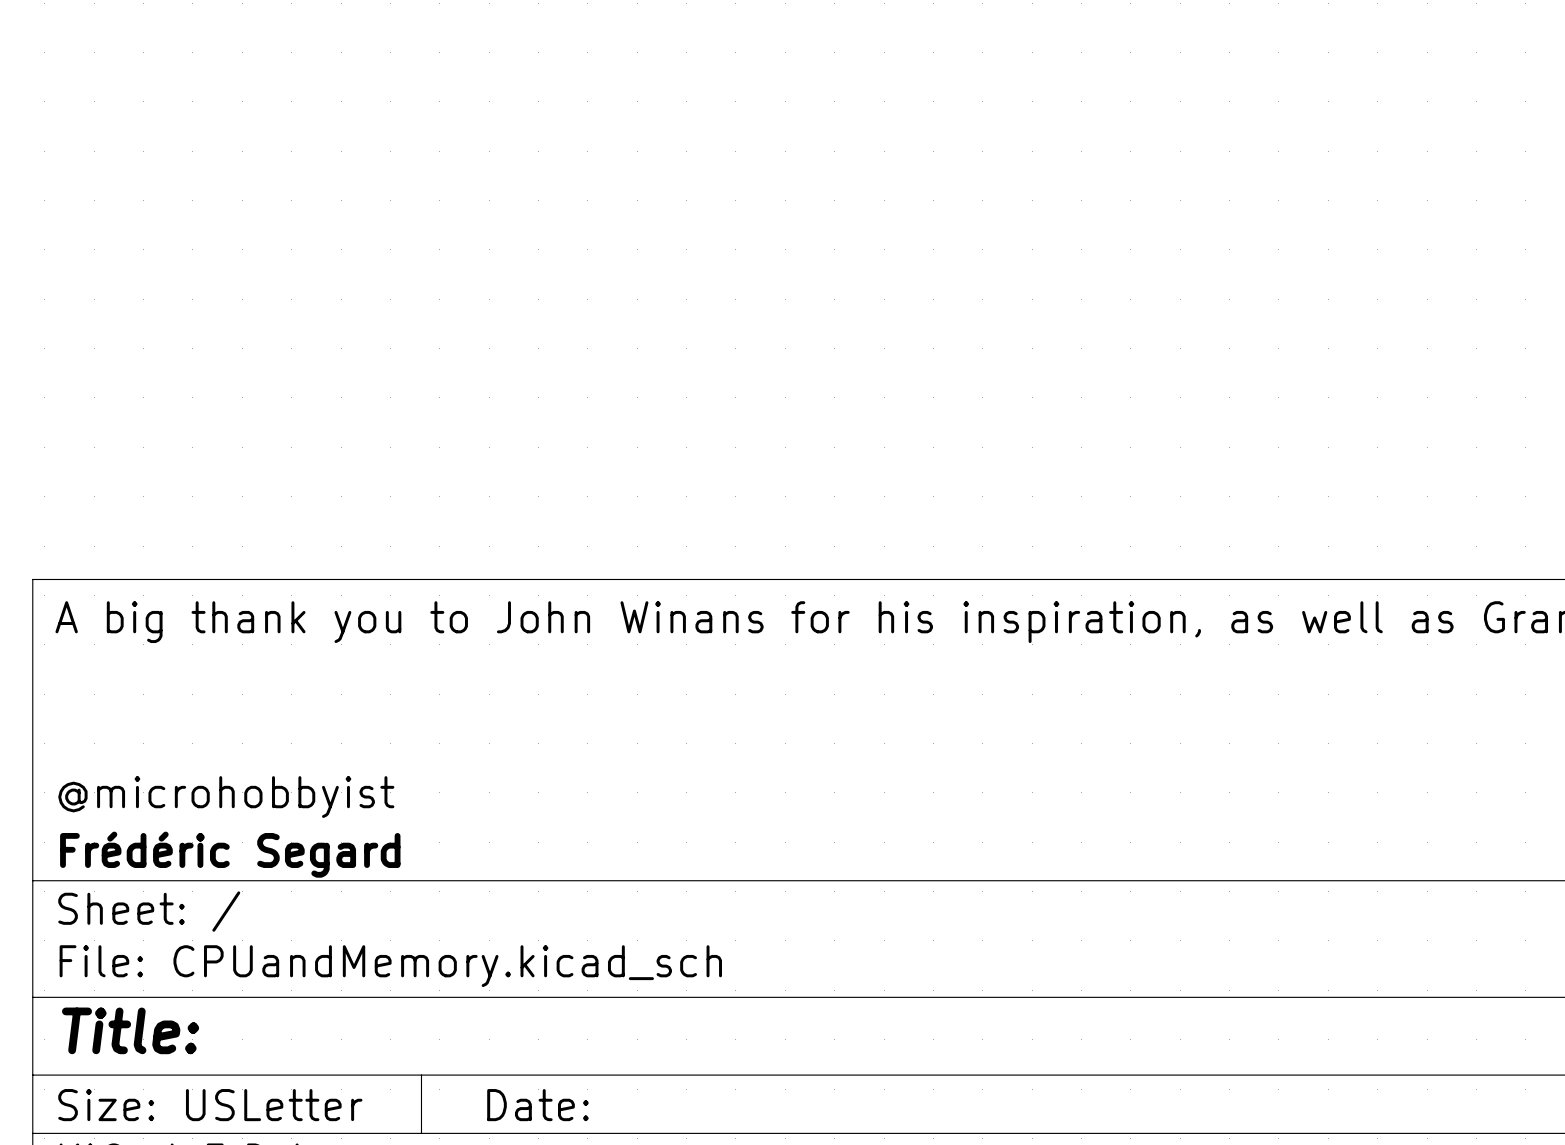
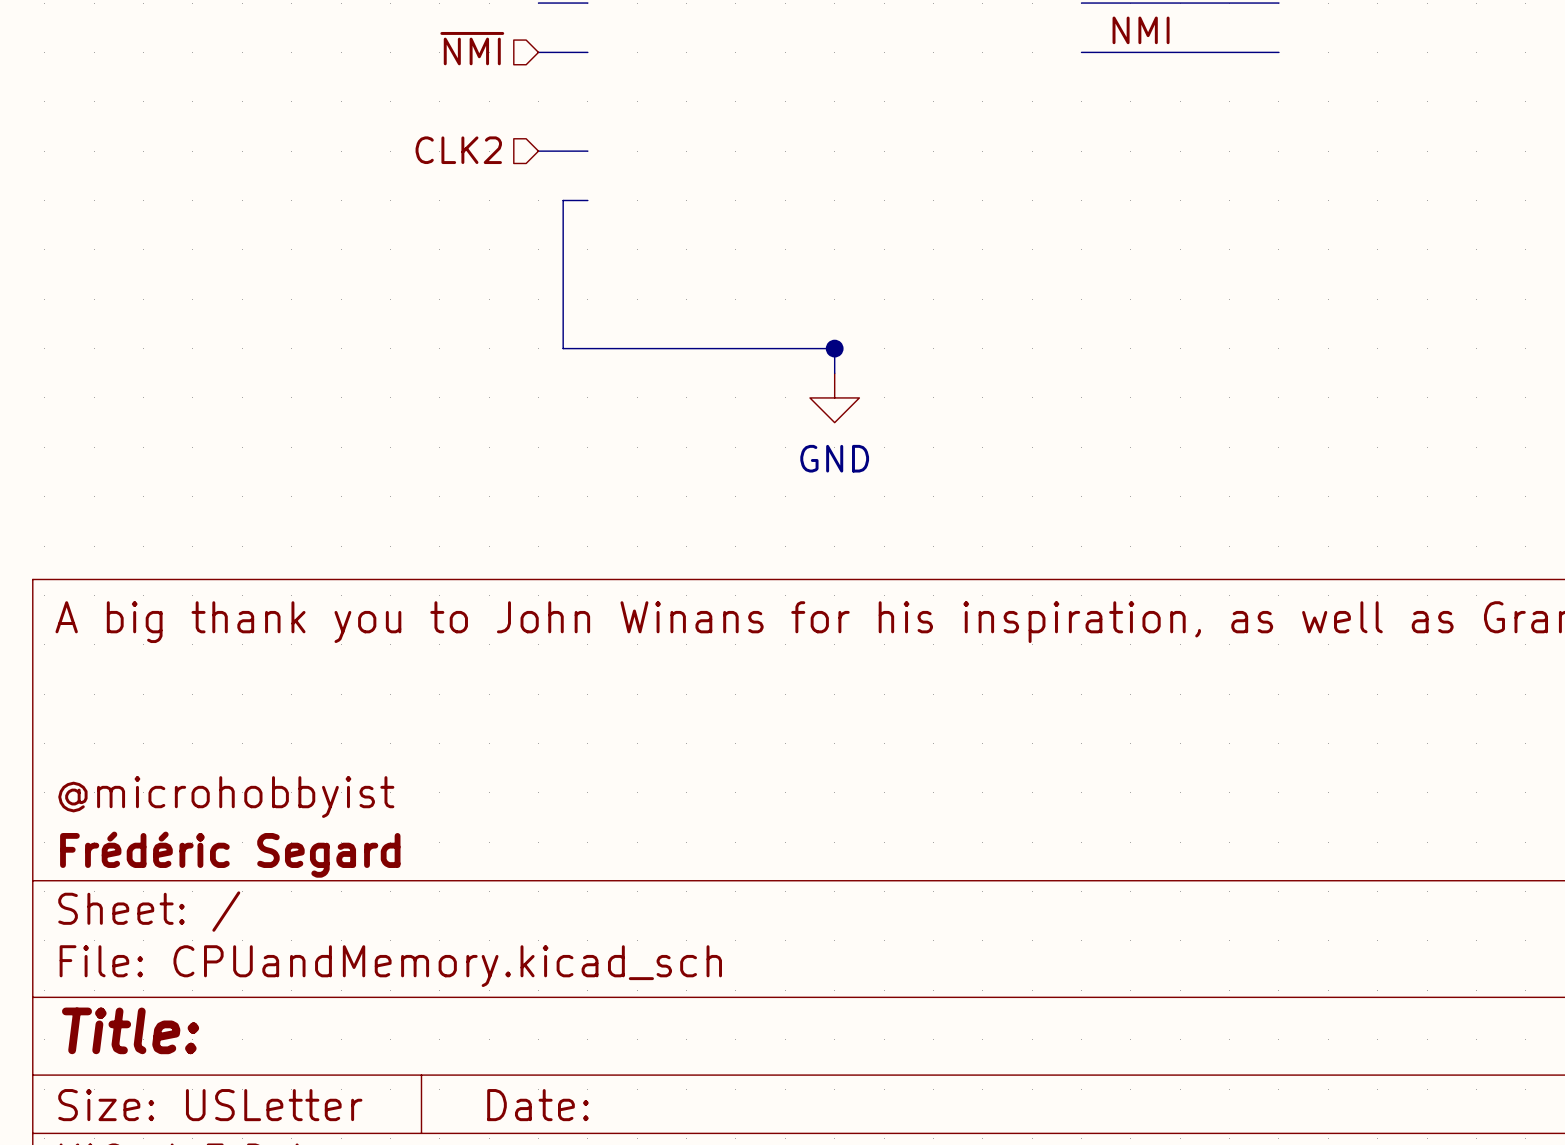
wire: none -> (538, 3) (587, 3)
wire: none -> (1081, 3) (1278, 3)
label: none -> NMI (1141, 30)
hierarchical label: none -> ~{NMI} (472, 48)
wire: none -> (538, 52) (587, 52)
wire: none -> (1081, 52) (1278, 52)
hierarchical label: none -> CLK2 (458, 150)
wire: none -> (538, 151) (587, 151)
wire: none -> (587, 200) (563, 200) (563, 348) (834, 348) (834, 373)
junction: none -> (834, 348)
power symbol: none -> GND (834, 397)

